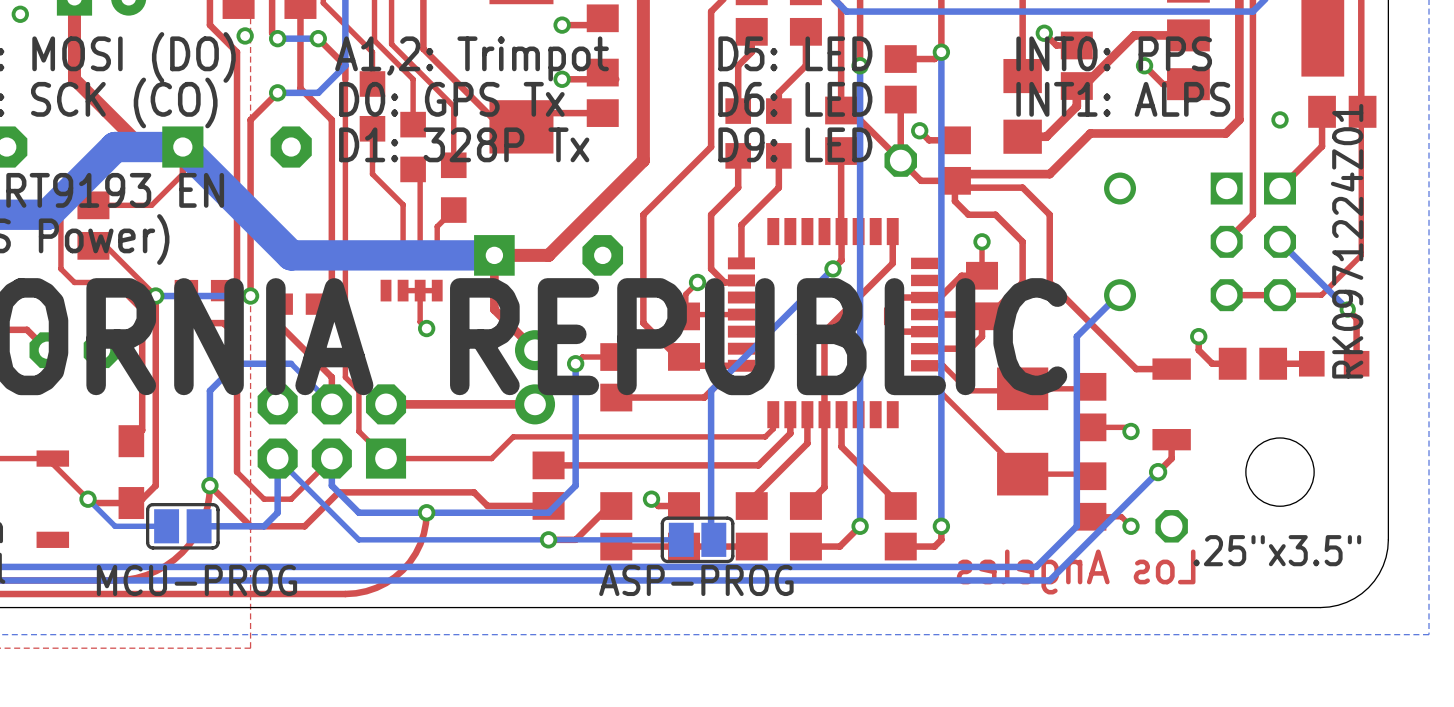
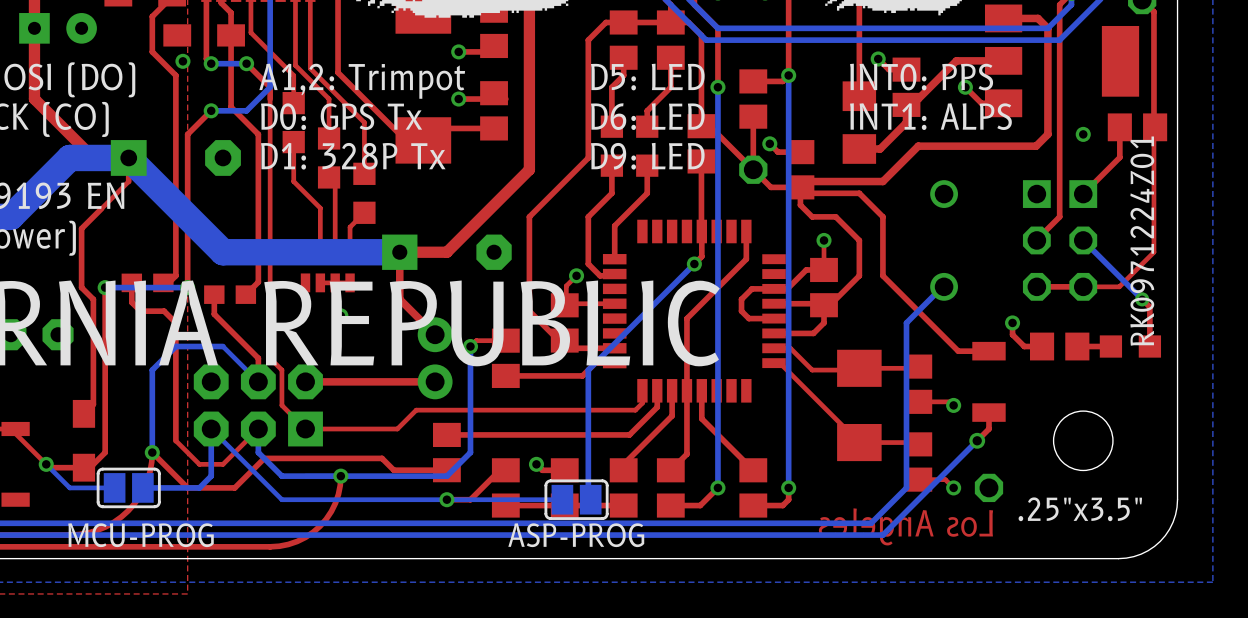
top track: (151, 205) (93, 205) (89, 201) (74, 201) (60, 214) (60, 268) (74, 282) (115, 282) (128, 296) -> (101, 208) (81, 228) (81, 287)
part: (93, 225) -> none
top track: (93, 245) (105, 245) (155, 296) -> none

